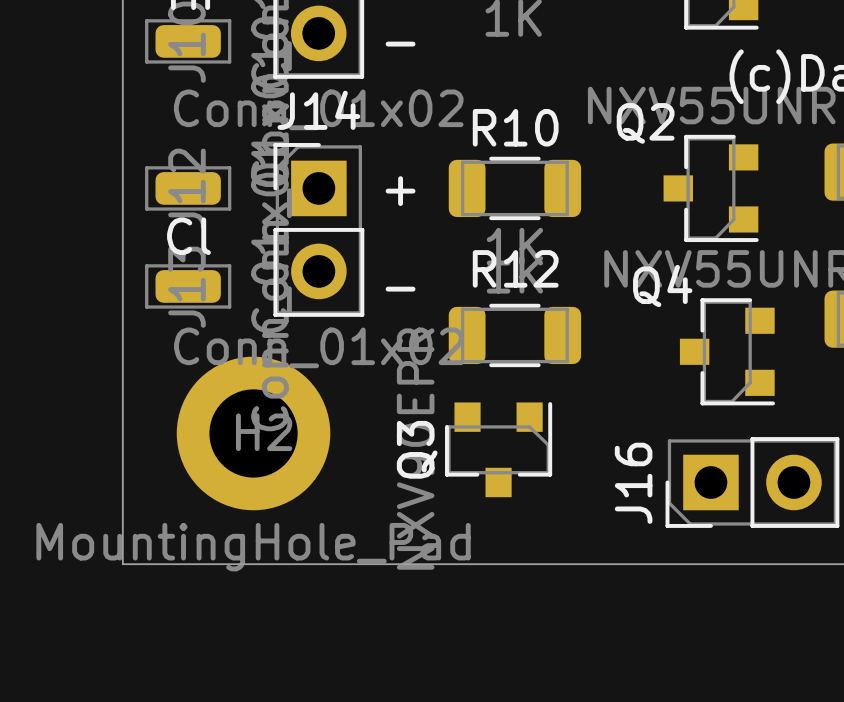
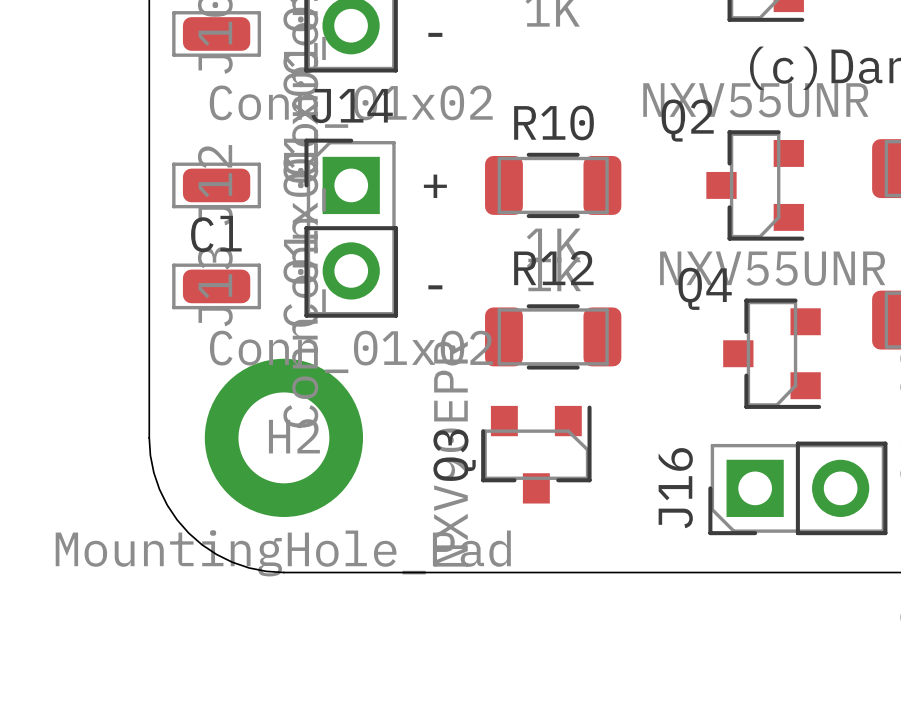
board edge: (122, 433) (122, 564) (253, 564) -> (149, 437) (153, 472) (159, 489) (167, 505) (188, 533) (201, 544) (232, 562) (249, 567) (283, 572)

